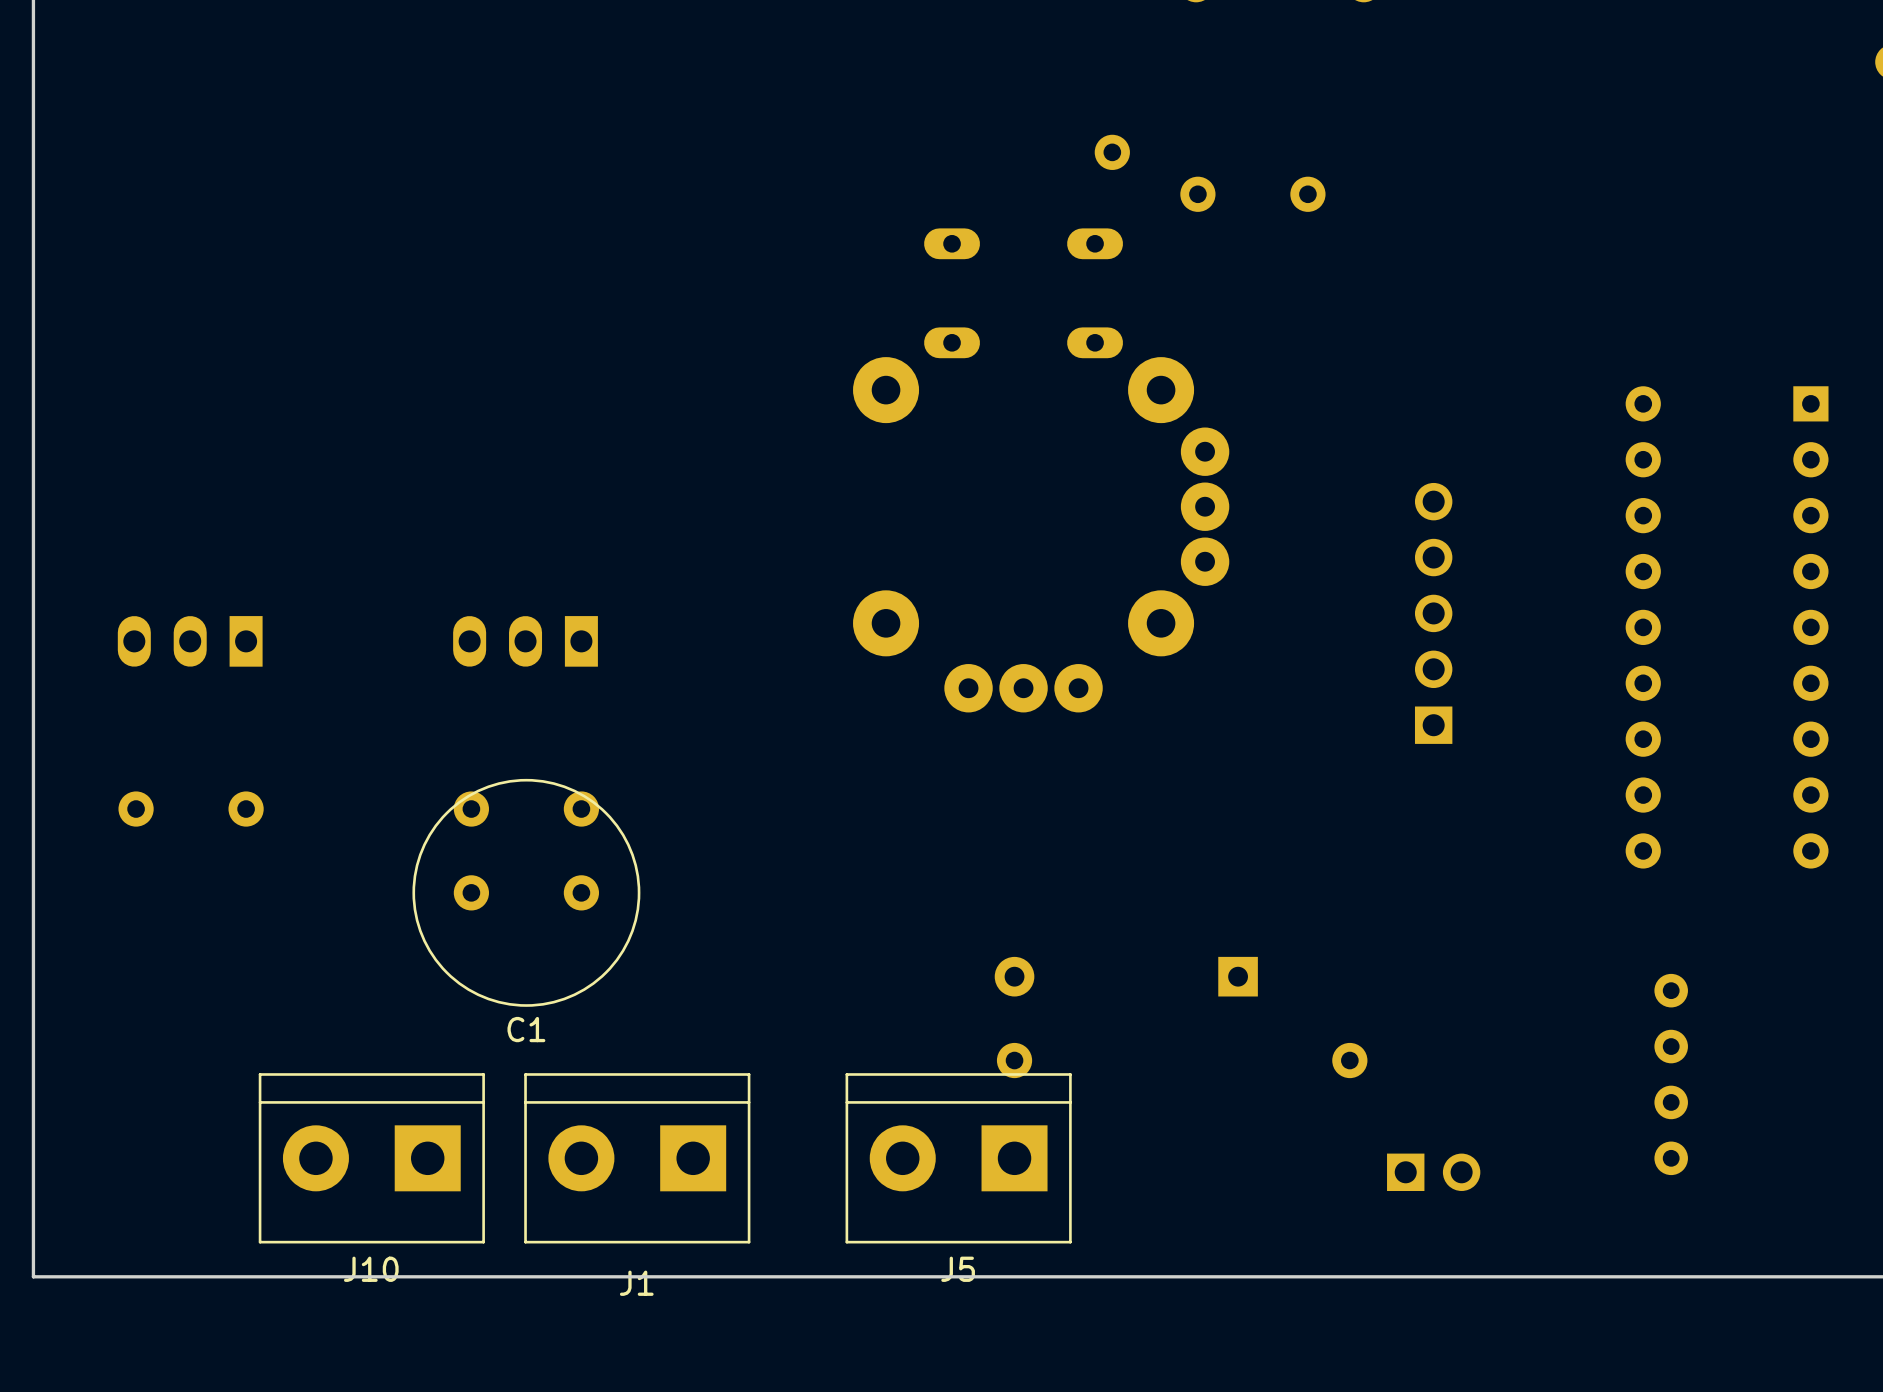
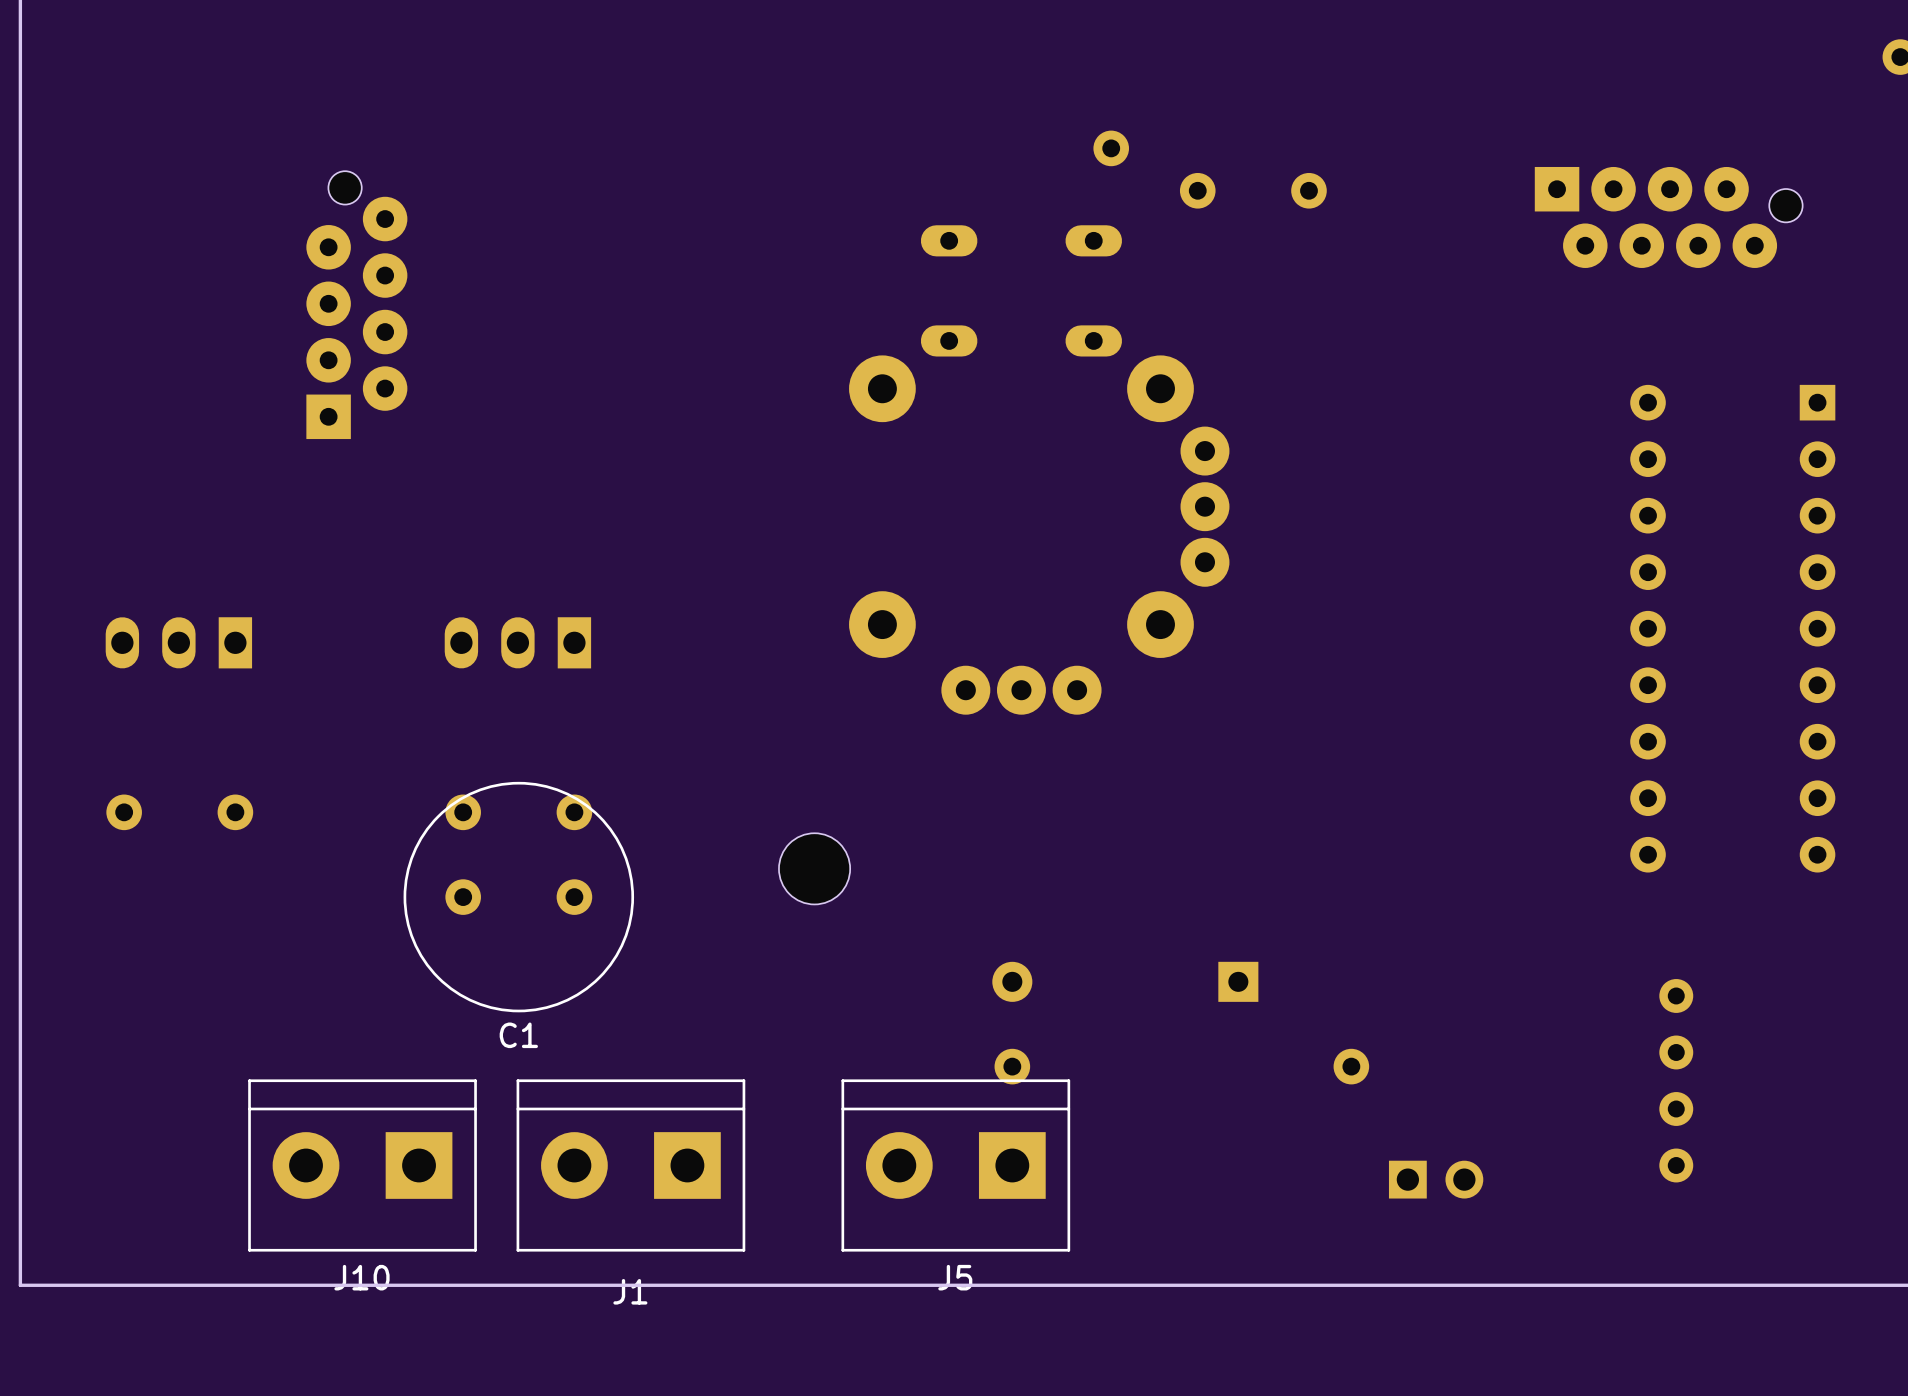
part: none -> (1668, 217)
part: none -> (356, 305)
part: (1433, 613) -> none
part: none -> (814, 868)

